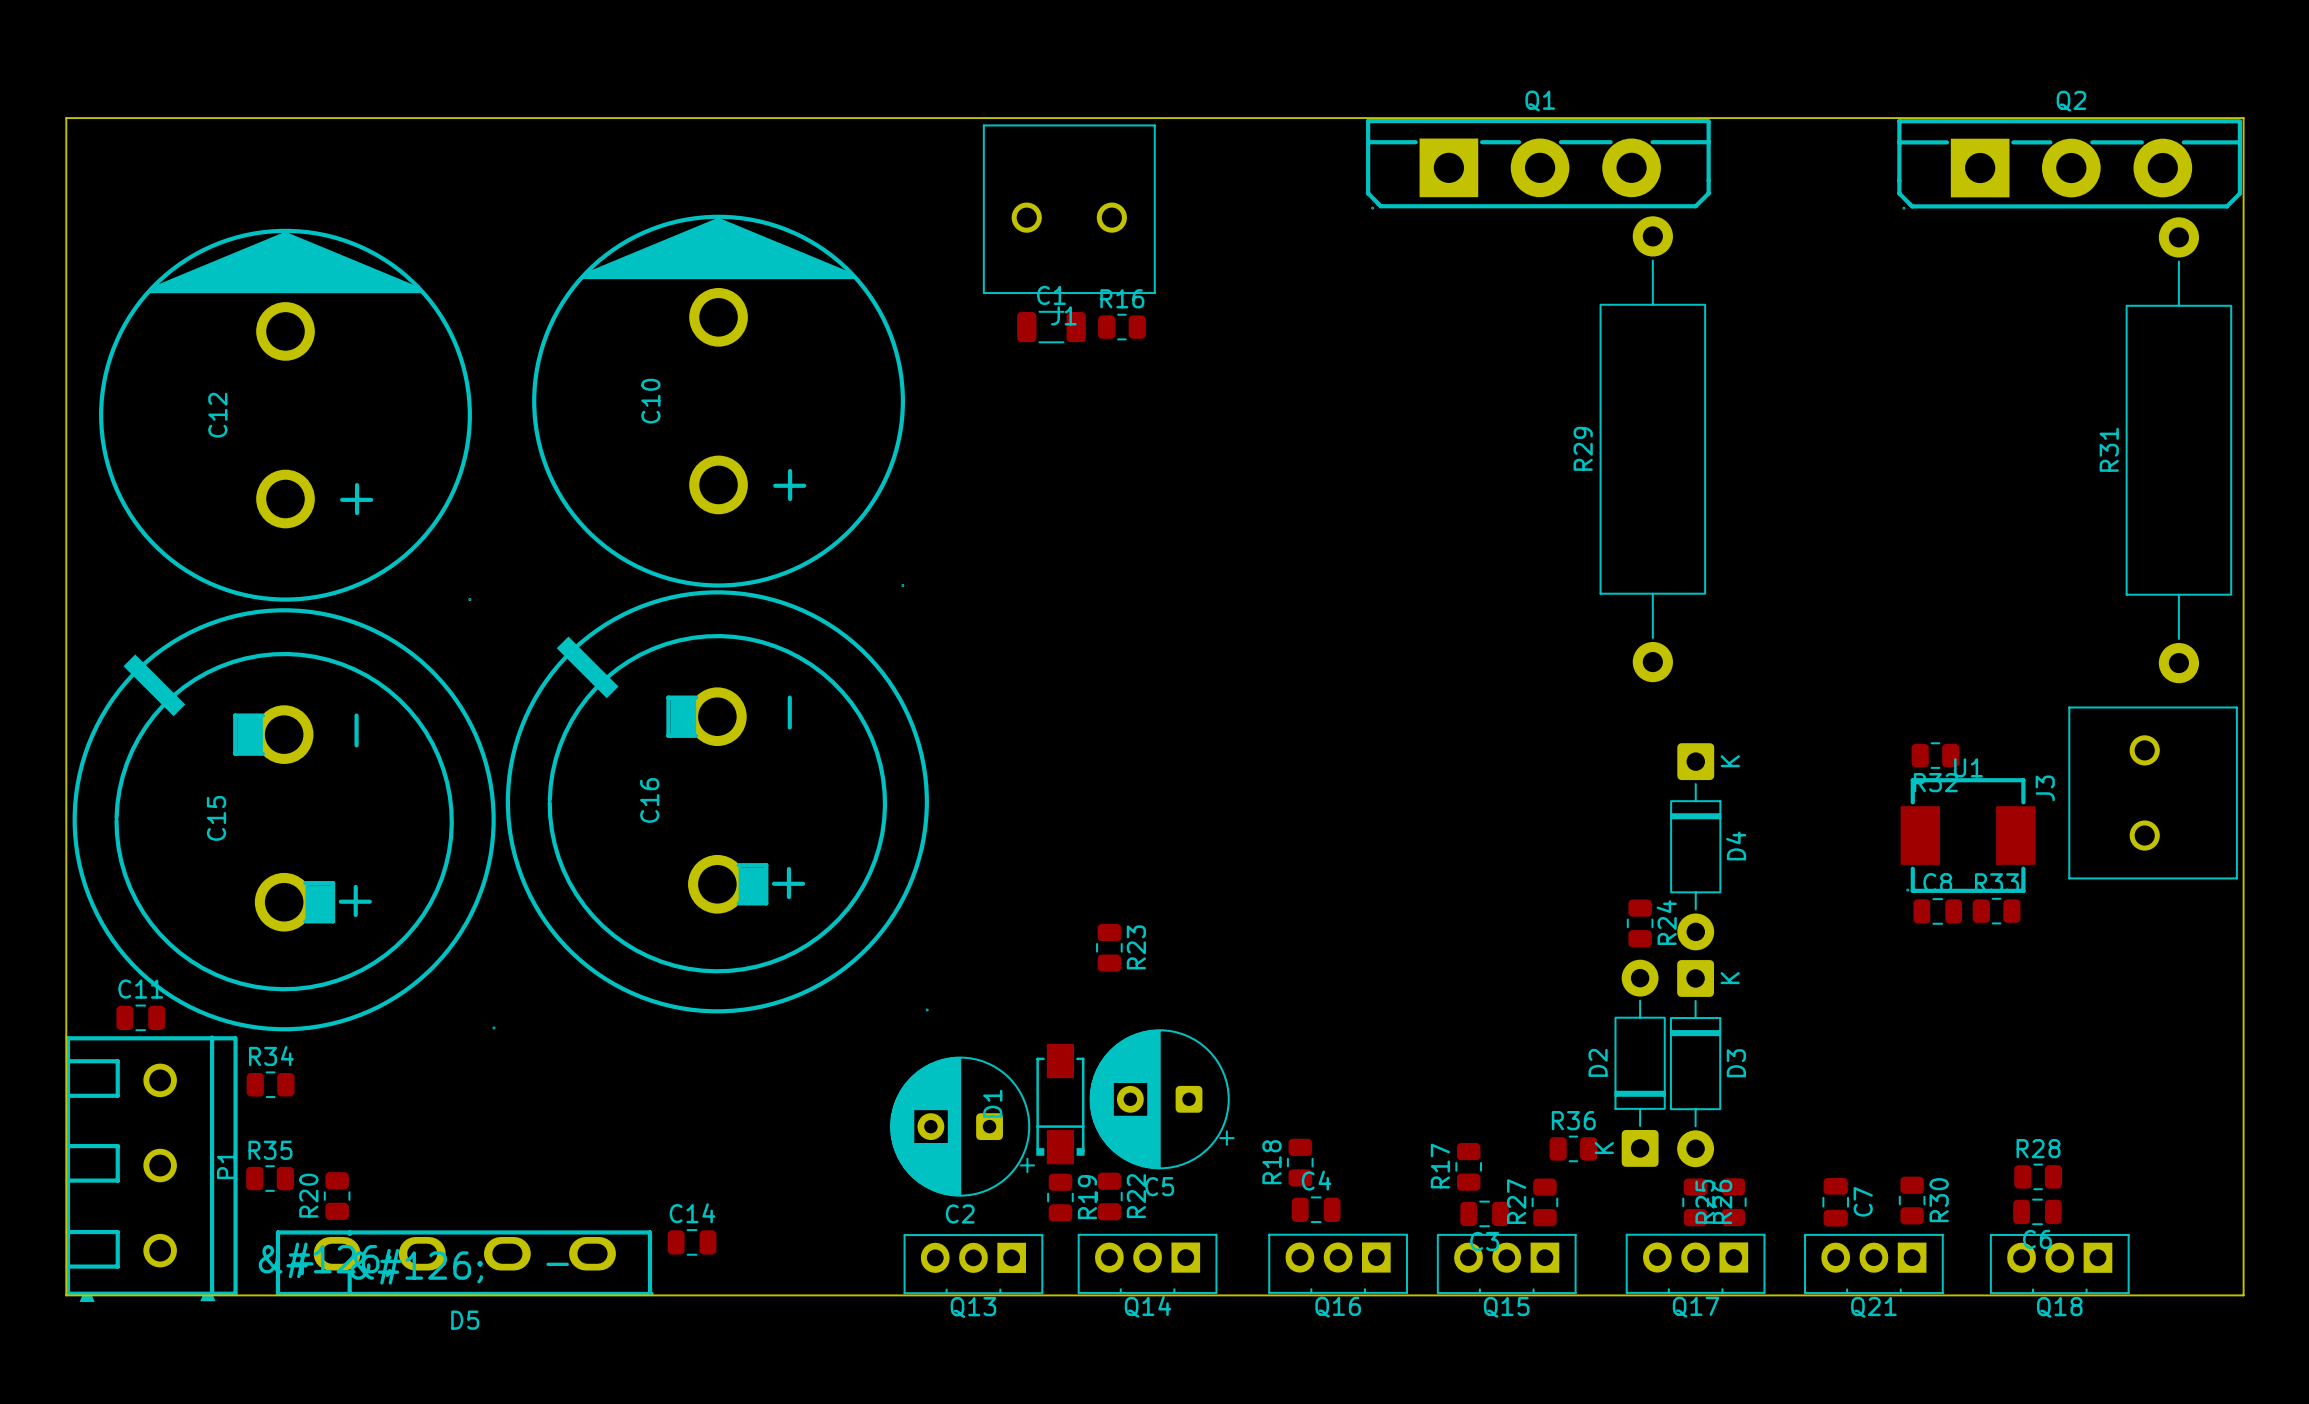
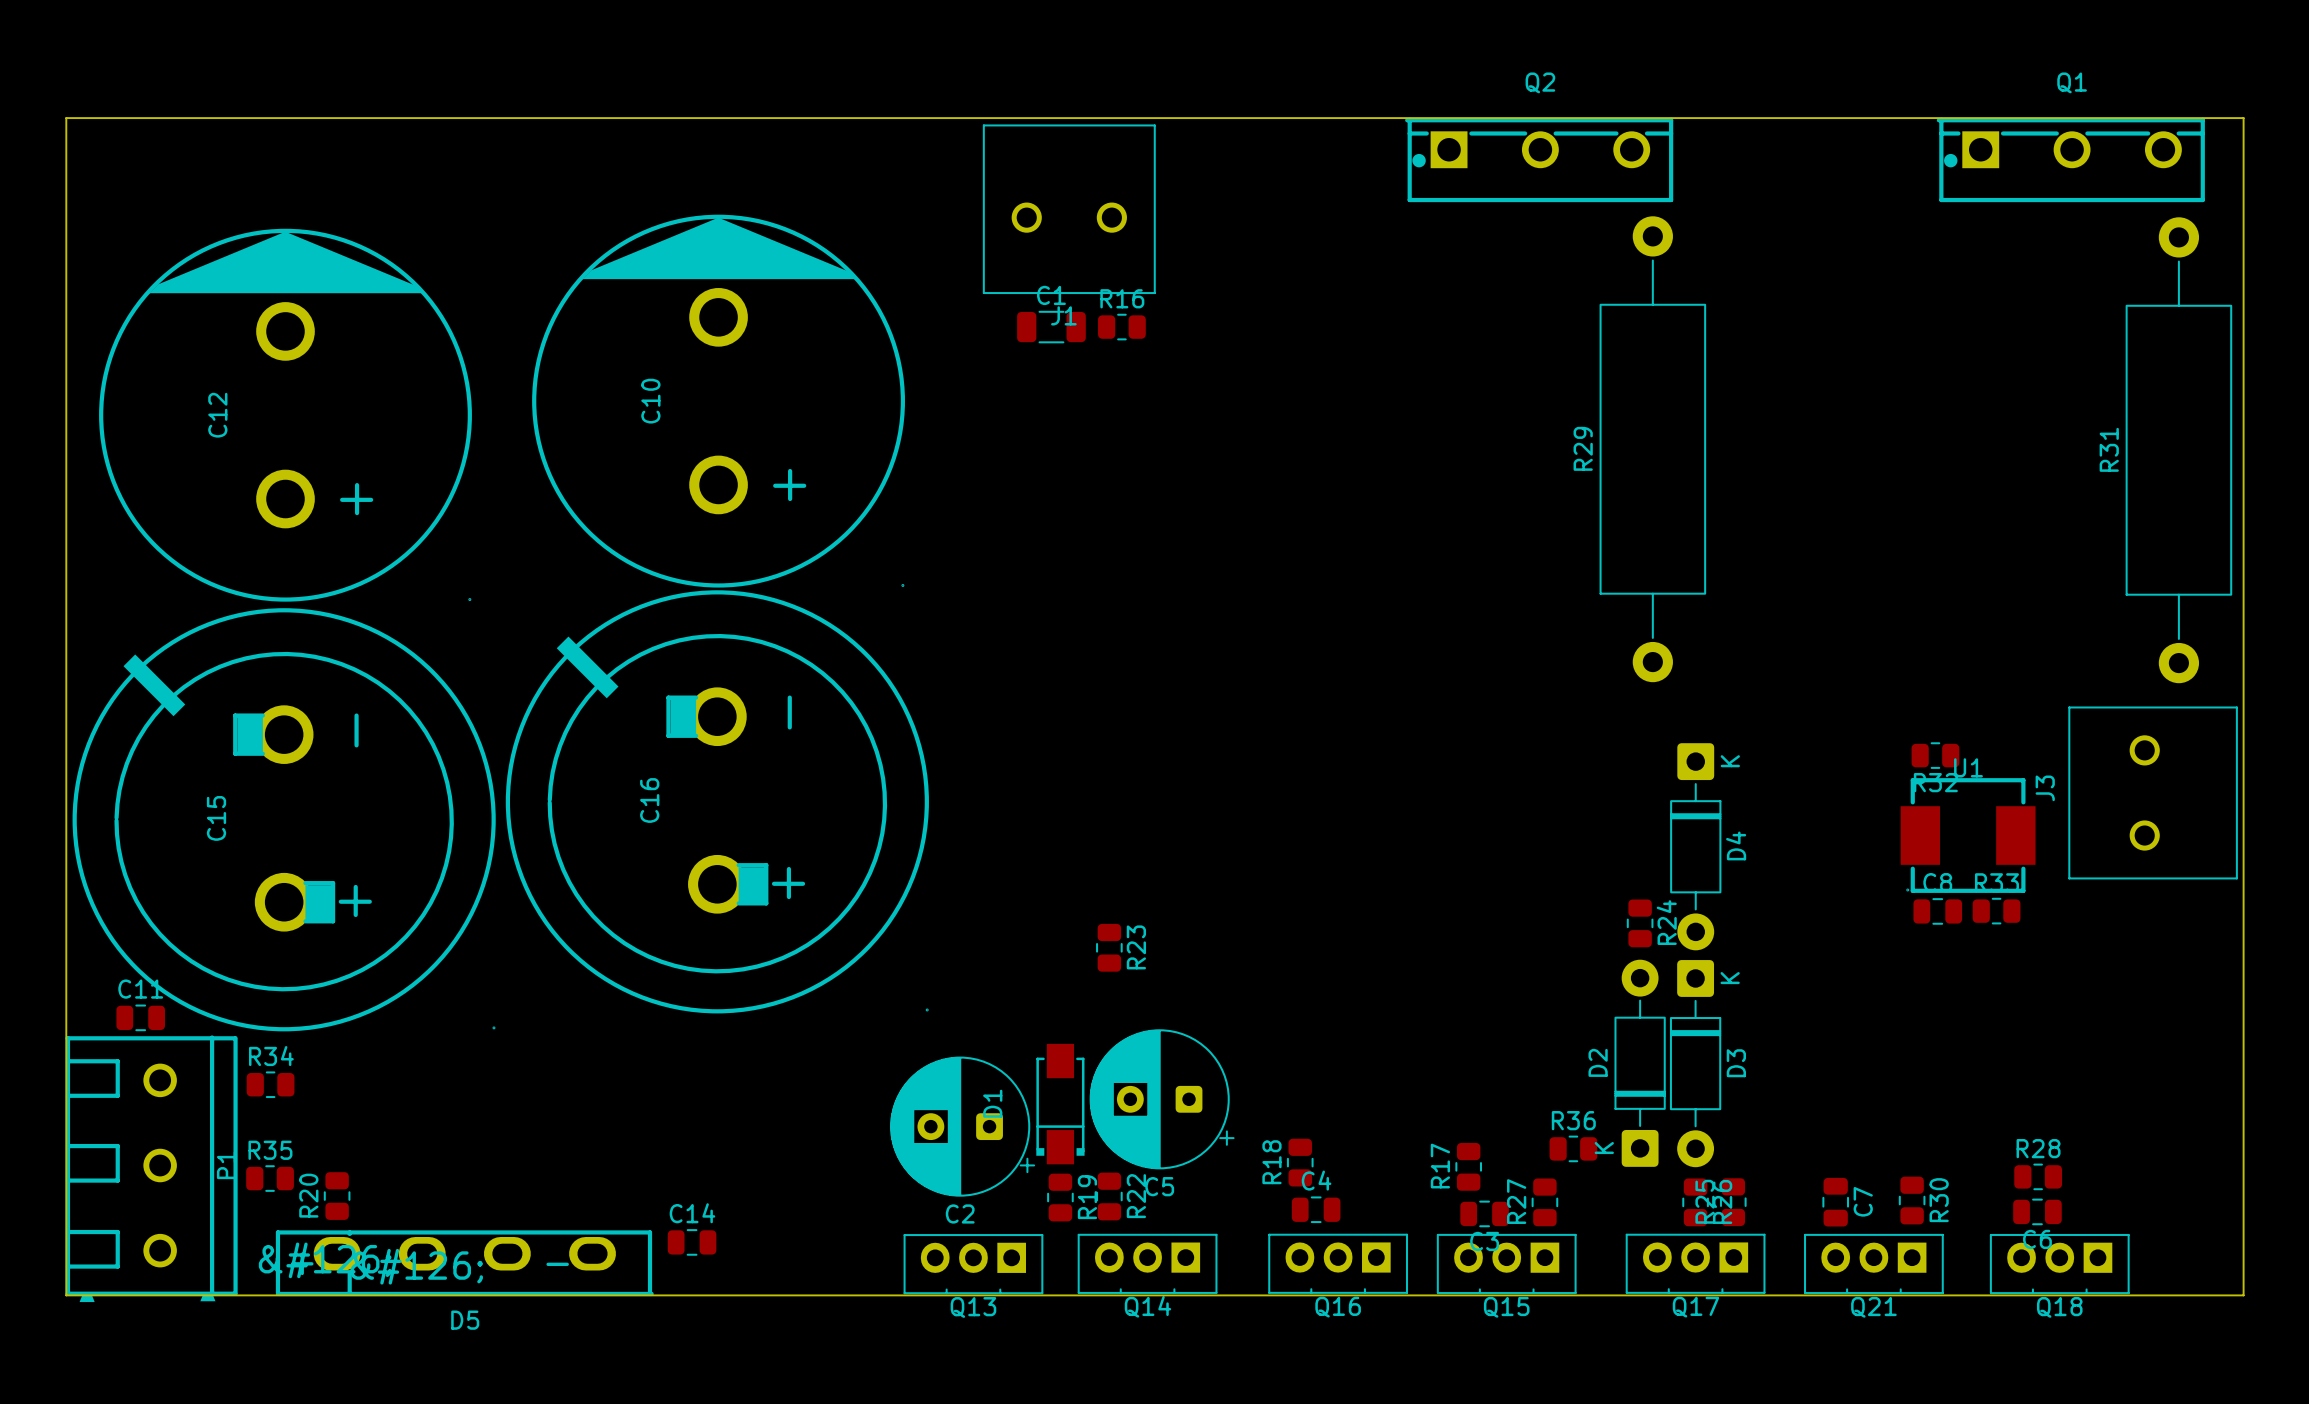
Q1 footprint: [1366, 119, 1711, 210] -> [1936, 117, 2205, 203]
Q2 footprint: [1897, 119, 2243, 210] -> [1405, 117, 1674, 203]

